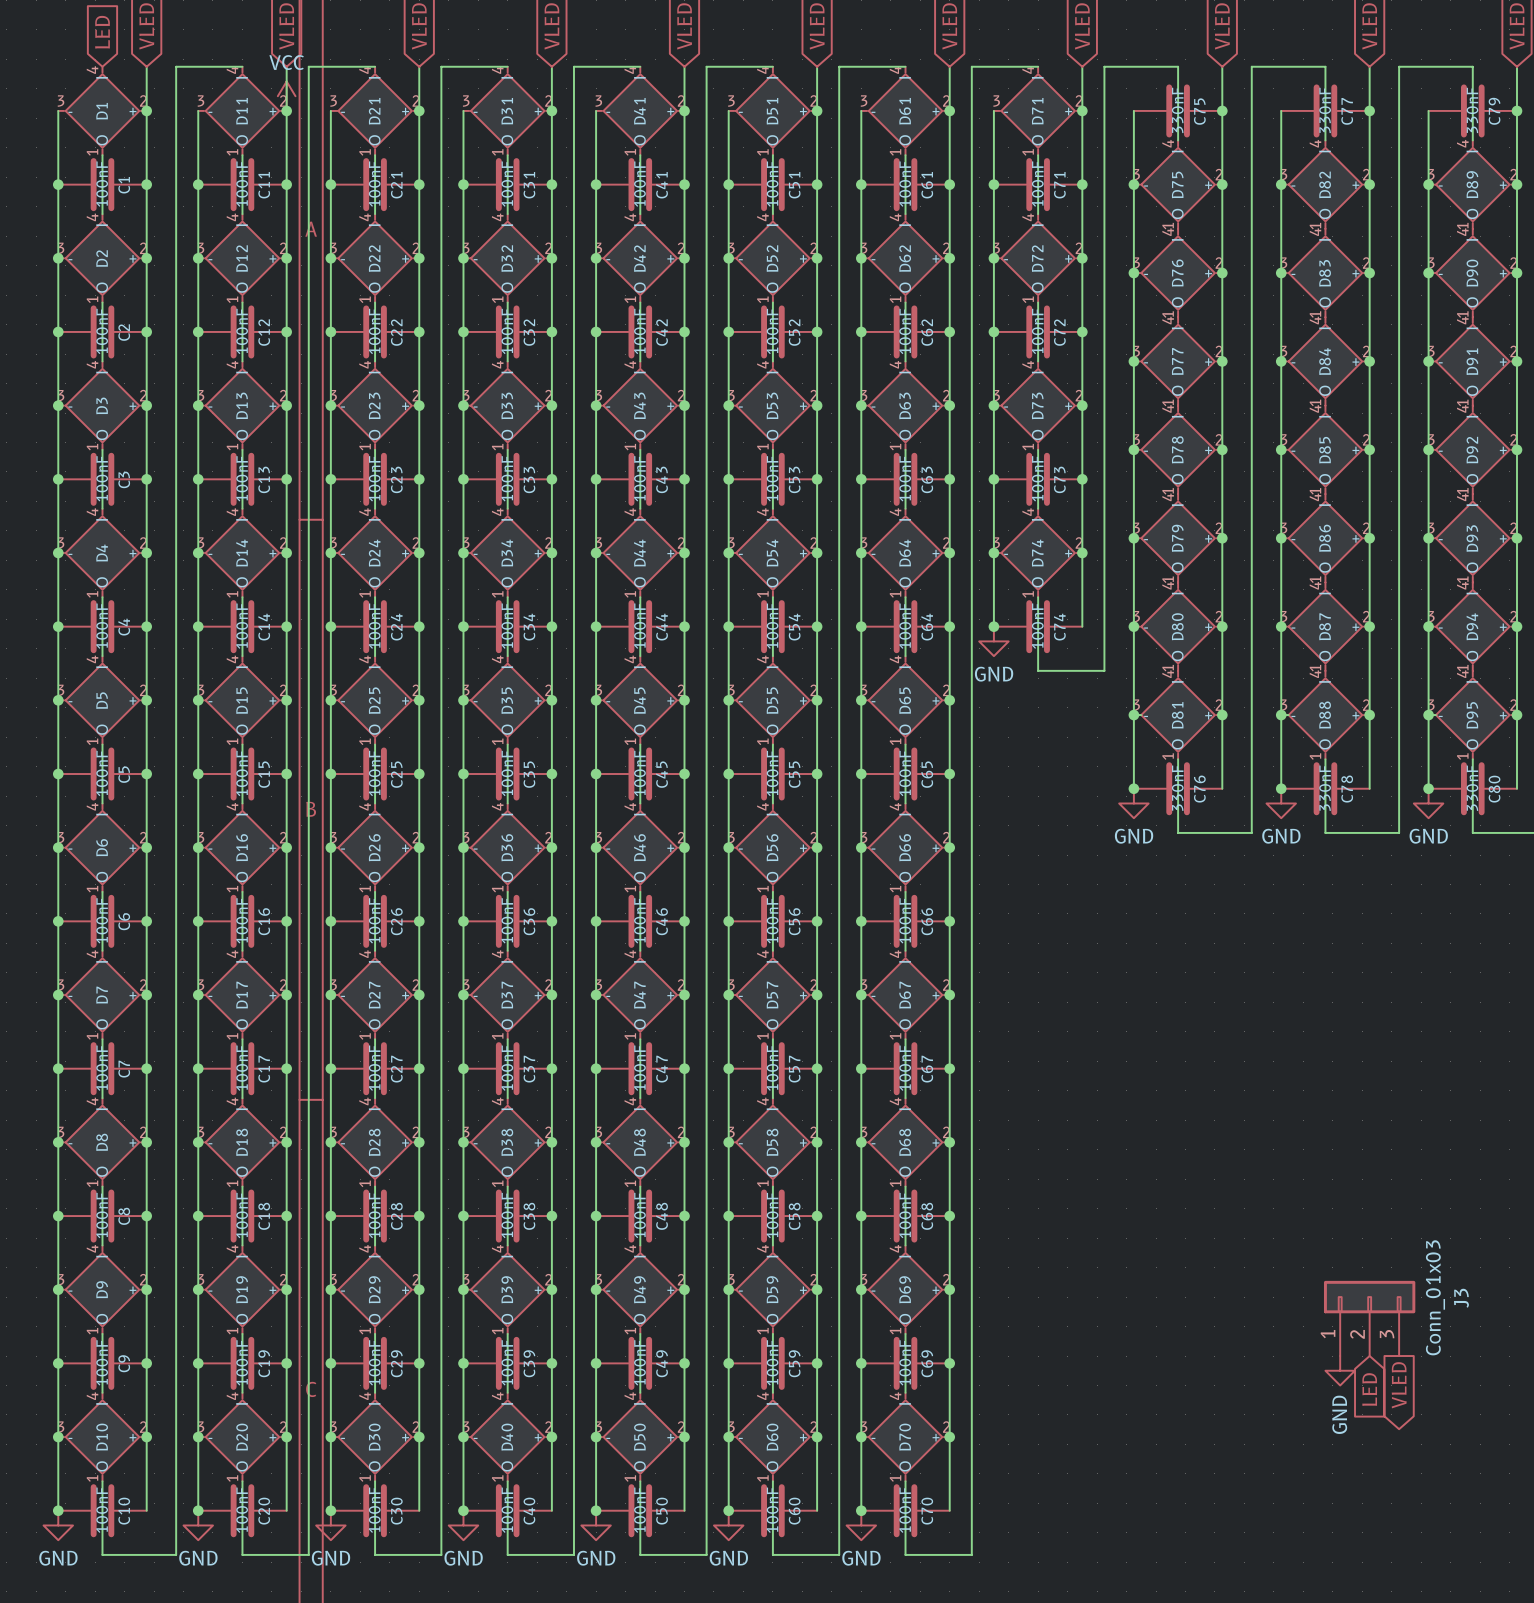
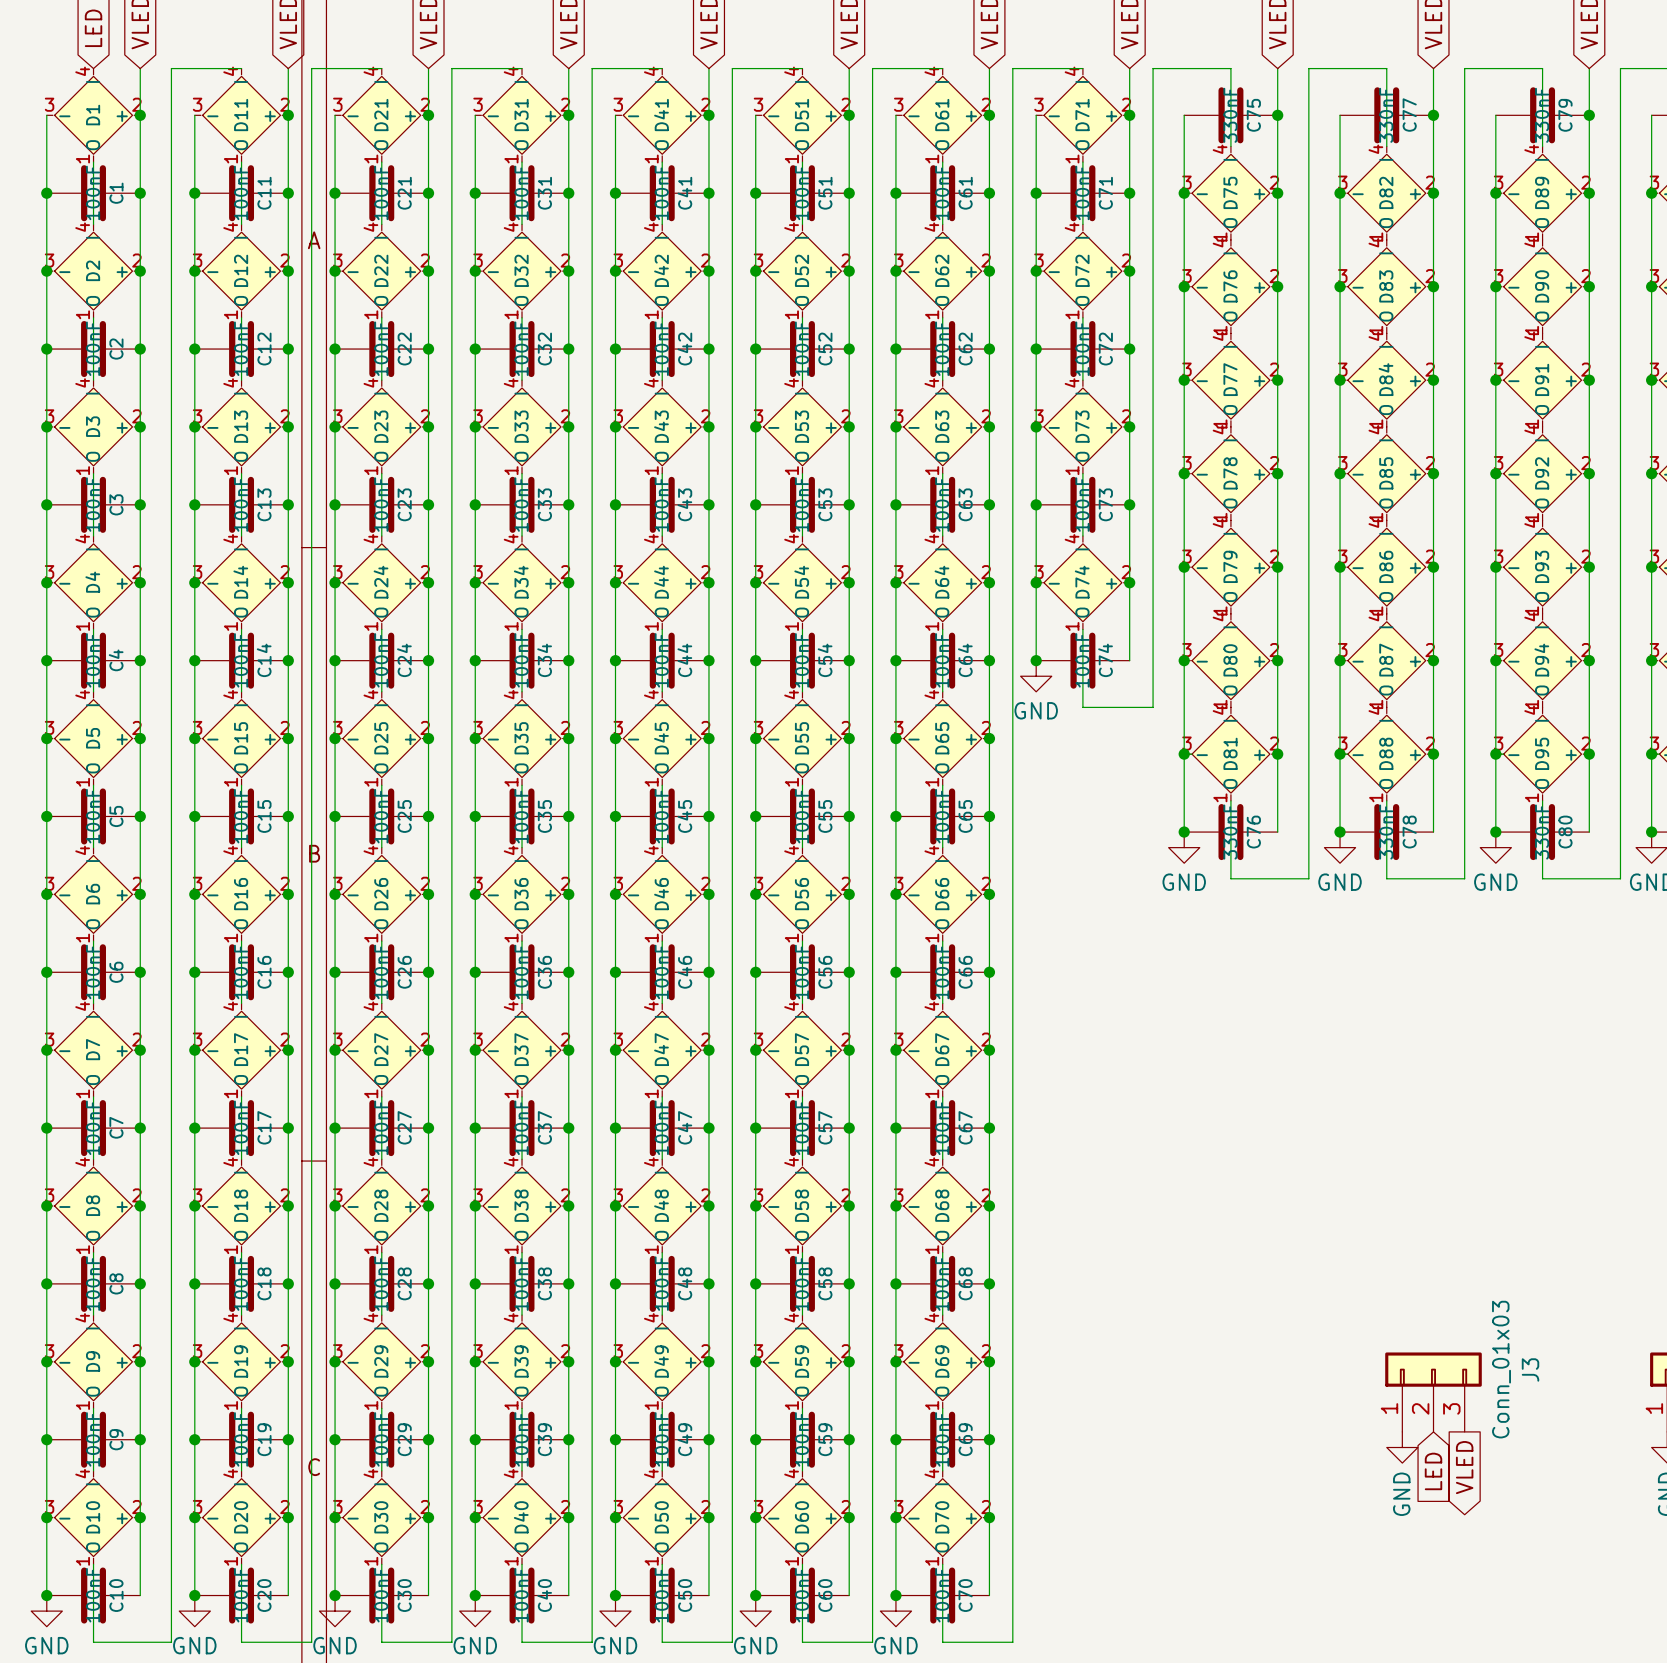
power symbol: VCC (286, 96) -> none

